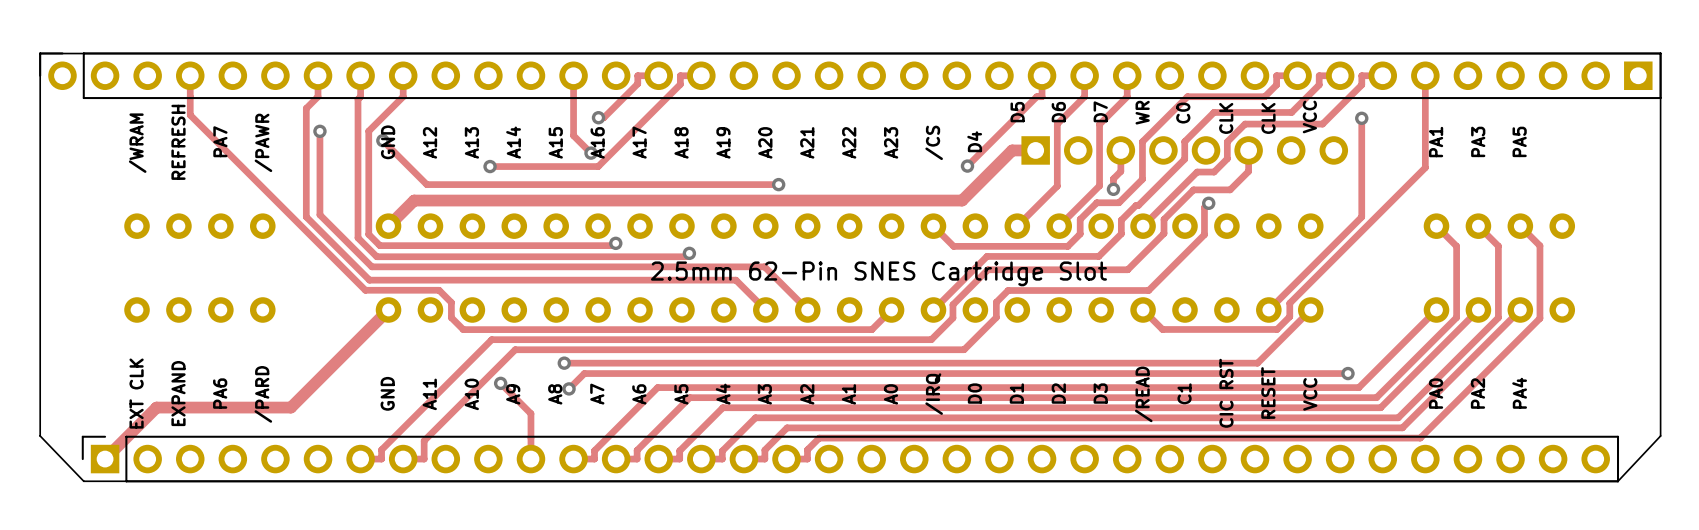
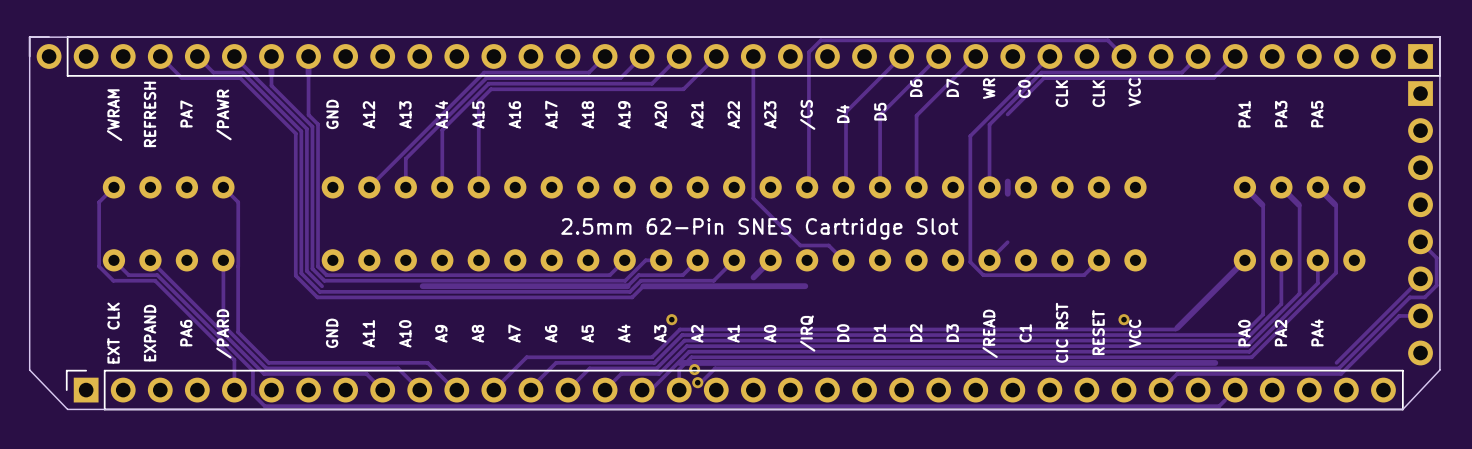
track: (190, 75) (190, 115) (365, 290) (439, 290) (451, 302) (451, 317) (463, 329) (871, 329) -> (160, 56) (181, 78) (240, 78) (295, 133) (295, 275) (317, 297) (632, 297) (643, 286) (805, 286)
track: none -> (197, 56) (213, 72) (242, 72) (301, 131) (301, 273) (319, 291) (629, 291) (641, 280) (713, 280) (734, 260)
track: none -> (234, 56) (306, 128) (306, 271) (322, 286)
track: (403, 75) (403, 96) (368, 131) (368, 234) (379, 245) (613, 245) (615, 243) -> none
track: (573, 75) (573, 135) (591, 153) -> none
track: (658, 75) (637, 75) (637, 83) (603, 117) (598, 117) -> none
track: (701, 75) (680, 75) (680, 84) (598, 166) (490, 166) -> (605, 56) (588, 72) (484, 72) (369, 187)
track: none -> (642, 56) (620, 78) (486, 78) (405, 158) (405, 187)
track: none -> (679, 56) (651, 83) (488, 83) (442, 130) (442, 187)
track: none -> (716, 56) (683, 89) (491, 89) (478, 101) (478, 187)
track: none -> (753, 56) (753, 198) (800, 245) (828, 245) (843, 260)
track: (1042, 75) (1042, 96) (1036, 96) (967, 166) -> (901, 56) (846, 112) (846, 184) (843, 187)
track: (1084, 75) (1084, 96) (1057, 124) (1057, 186) (1017, 226) -> (938, 56) (880, 115) (880, 187)
track: (1127, 75) (1127, 96) (1099, 124) (1099, 185) (1059, 226) -> (975, 56) (916, 115) (916, 187)
track: (1297, 75) (1276, 75) (1276, 84) (1264, 96) (1187, 96) (1142, 141) (1142, 179) (1119, 202) (1096, 202) (1080, 219) (1080, 234) (1067, 246) (953, 246) (933, 226) -> (1124, 56) (1107, 40) (820, 40) (808, 52) (808, 185) (807, 187)
track: (1340, 75) (1319, 75) (1319, 84) (1291, 112) (1213, 112) (1184, 141) (1184, 159) (1121, 220) (1121, 233) (1098, 256) (987, 256) (933, 309) -> none
track: (1382, 75) (1361, 75) (1361, 84) (1322, 124) (1245, 124) (1227, 141) (1227, 158) (1214, 172) (1197, 172) (1143, 226) -> (1198, 56) (1182, 72) (1041, 72) (989, 124) (989, 187)
track: (1425, 75) (1425, 167) (1289, 303) (1289, 316) (1277, 329) (1162, 329) (1143, 309) -> (1235, 56) (1213, 78) (1043, 78) (1007, 114)
track: (318, 96) (306, 108) (306, 216) (369, 280) (735, 280) (765, 309) -> (271, 74) (271, 85) (312, 126) (312, 268) (324, 280) (625, 280) (645, 260) (661, 260)
track: (360, 96) (358, 99) (358, 237) (376, 256) (686, 256) (689, 253) -> (308, 74) (308, 114) (318, 124) (318, 266) (326, 275) (609, 275) (624, 260)
text position: D5 (1017, 112) -> D5 (880, 111)
via: (598, 117) -> none
track: (1361, 118) (1361, 217) (1268, 309) -> (1049, 56) (970, 136) (970, 262) (983, 275) (1084, 275) (1098, 260)
via: (1361, 118) -> none
track: (319, 131) (319, 214) (371, 266) (764, 266) (807, 309) -> (422, 286) (627, 286) (638, 275) (682, 275) (697, 260)
via: (319, 131) -> none
track: (382, 140) (426, 184) (778, 184) -> none
via: (382, 140) -> none
track: (1035, 150) (1012, 150) (962, 200) (414, 200) (388, 226) -> none
track: (1120, 150) (1120, 171) (1113, 178) (1113, 189) -> none
part: (1184, 150) -> none
track: (1248, 150) (1248, 171) (1230, 189) (1193, 189) (1164, 219) -> none
via: (591, 153) -> none
via: (490, 166) -> none
via: (967, 166) -> none
via: (778, 184) -> none
via: (1113, 189) -> none
track: (1208, 203) (1204, 207) (1204, 234) (1148, 290) (1008, 290) (996, 302) (996, 317) (964, 349) (515, 349) (424, 440) (424, 459) (403, 459) -> none
via: (1208, 203) -> none
track: none -> (113, 187) (99, 202) (99, 266) (113, 280) (155, 280) (234, 360) (234, 390)
track: none -> (223, 187) (238, 202) (238, 266)
track: (1164, 233) (1127, 269) (987, 269) (952, 304) (952, 318) (931, 339) (491, 339) (381, 449) (381, 459) (360, 459) -> none
via: (615, 243) -> none
track: (1539, 245) (1539, 318) (1420, 438) (819, 438) (807, 449) (807, 459) (786, 459) -> (1334, 204) (1336, 272) (1251, 357) (691, 357) (679, 369) (679, 390)
track: (1456, 246) (1456, 317) (1376, 397) (689, 397) (637, 450) (637, 459) (616, 459) -> (1262, 204) (1263, 314) (1242, 335) (682, 335) (654, 362) (556, 362) (530, 390)
track: (1498, 246) (1498, 317) (1398, 417) (755, 417) (722, 451) (722, 459) (701, 459) -> (1298, 204) (1299, 293) (1247, 346) (686, 346) (659, 373) (621, 373) (605, 390)
via: (689, 253) -> none
part: none -> (1420, 223)
track: none -> (1420, 241) (1436, 257) (1436, 285) (1424, 297) (1409, 297) (1338, 368) (715, 368) (700, 382) (697, 382)
track: none -> (1007, 242) (989, 260)
track: none -> (113, 260) (128, 275) (157, 275) (252, 370) (252, 394) (264, 406) (1219, 406) (1225, 400)
track: none -> (150, 260) (264, 373) (366, 373) (382, 390)
track: none -> (223, 260) (223, 325) (266, 368) (398, 368) (419, 390)
track: (388, 309) (290, 407) (156, 407) (105, 459) -> none
track: (1310, 309) (1257, 363) (564, 363) -> none
track: (1478, 309) (1380, 407) (722, 407) (679, 450) (679, 459) (658, 459) -> (1281, 260) (1281, 304) (1244, 340) (684, 340) (656, 368) (589, 368) (568, 390)
track: (1520, 309) (1402, 427) -> (1317, 260) (1317, 283) (1249, 351) (689, 351) (650, 390)
track: none -> (1420, 278) (1336, 362)
via: (564, 363) -> none
track: (1347, 373) (584, 373) (569, 388) -> none
via: (1347, 373) -> none
track: none -> (1420, 315) (1399, 315) (1341, 373) (1177, 373) (1161, 390)
via: none -> (671, 319)
via: none -> (1124, 319)
track: (500, 383) (530, 413) (530, 459) -> (238, 266) (238, 332) (268, 362) (427, 362) (456, 390)
via: (500, 383) -> none
track: (1358, 387) (657, 387) (594, 450) (594, 459) (573, 459) -> (1177, 327) (1175, 329) (679, 329) (652, 357) (526, 357) (493, 390)
via: (569, 388) -> none
track: (787, 427) (764, 450) (764, 459) (753, 459) -> none
via: none -> (694, 369)
via: none -> (697, 382)

